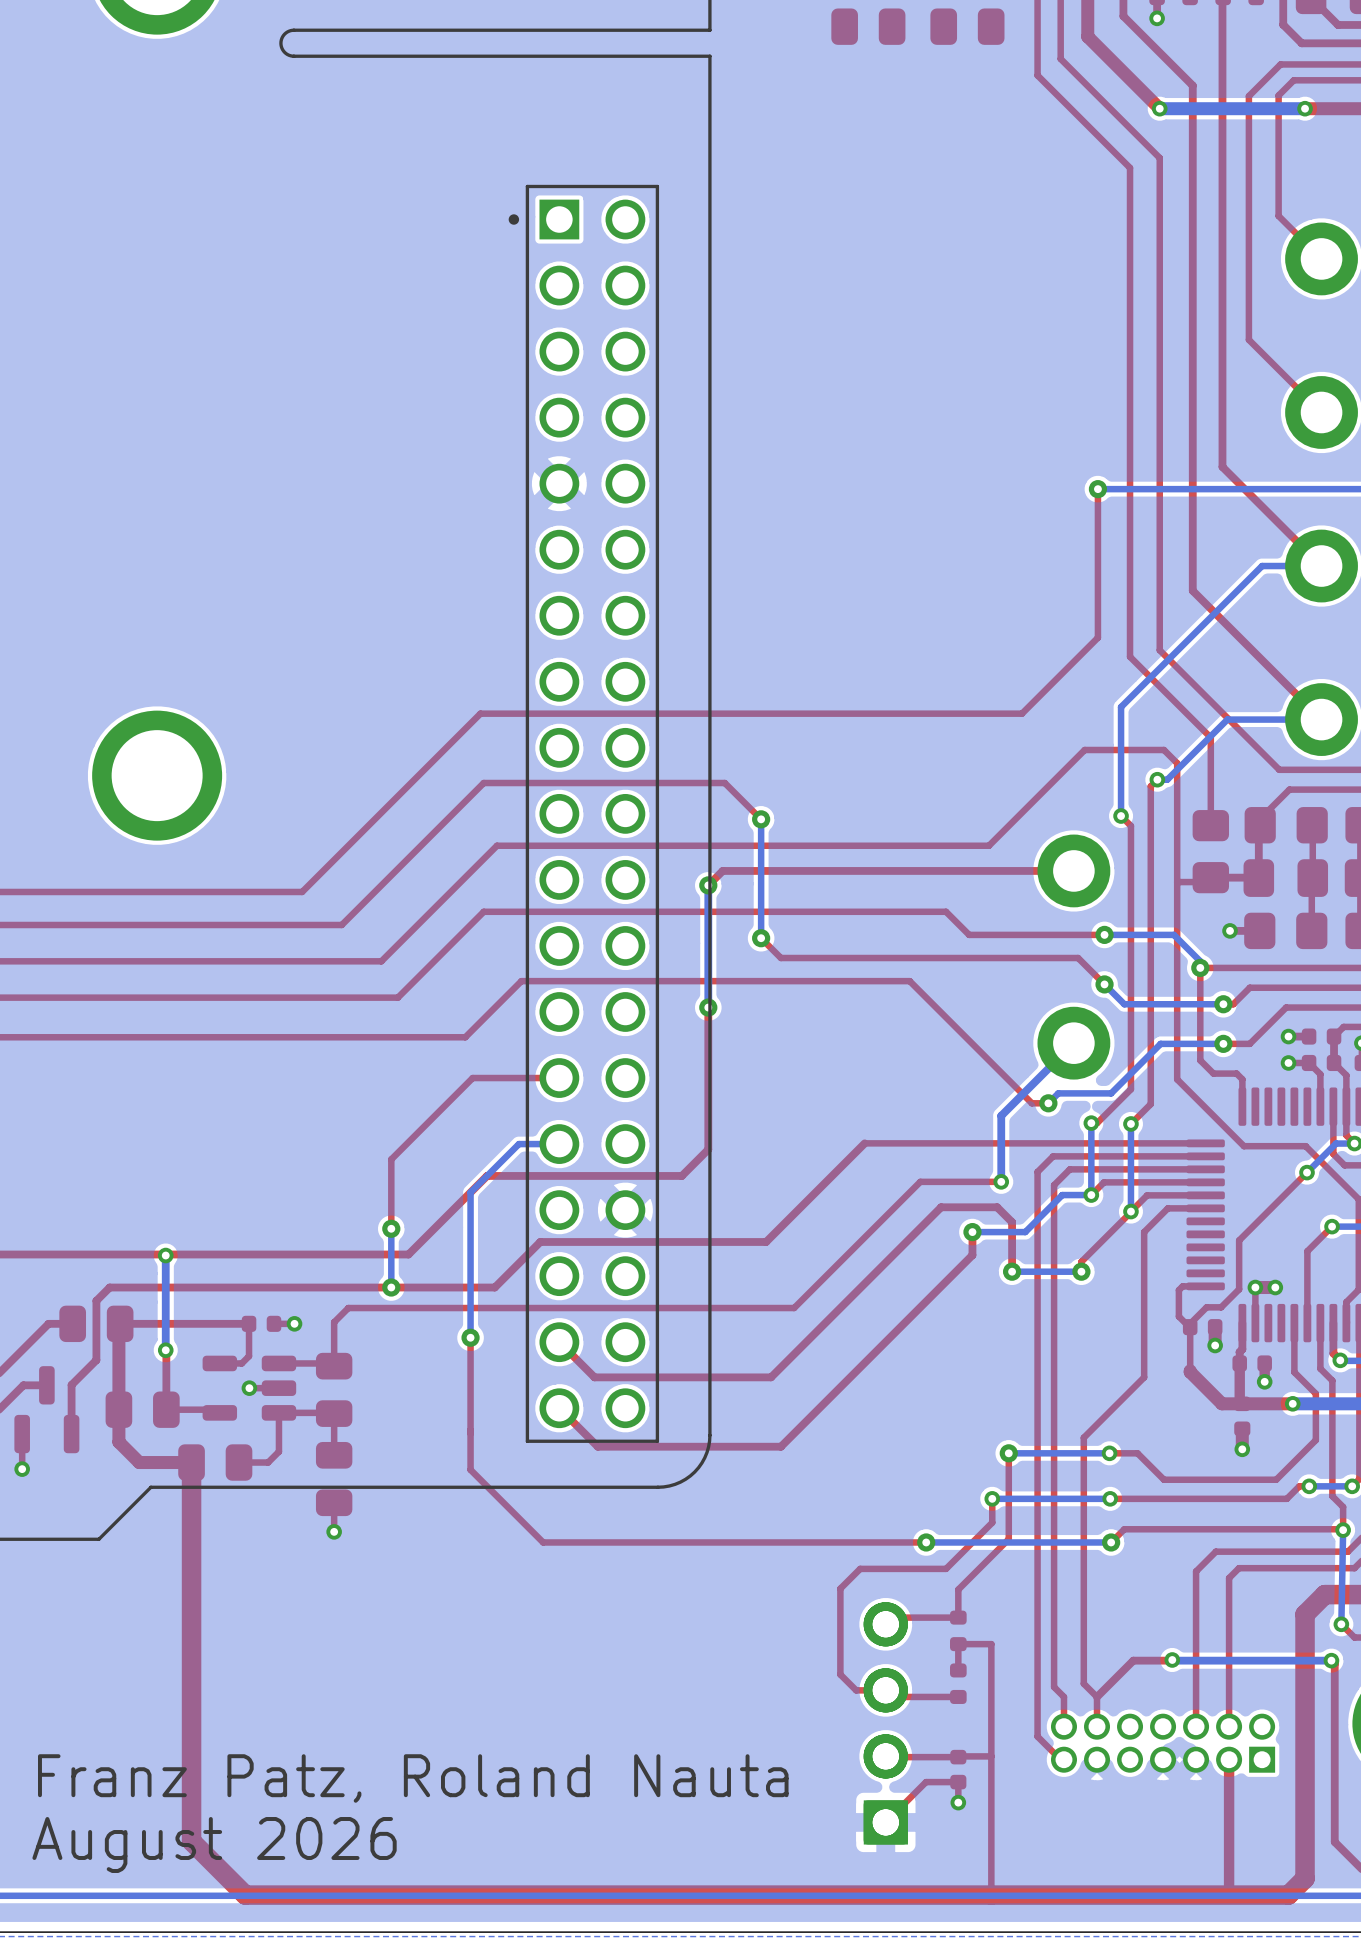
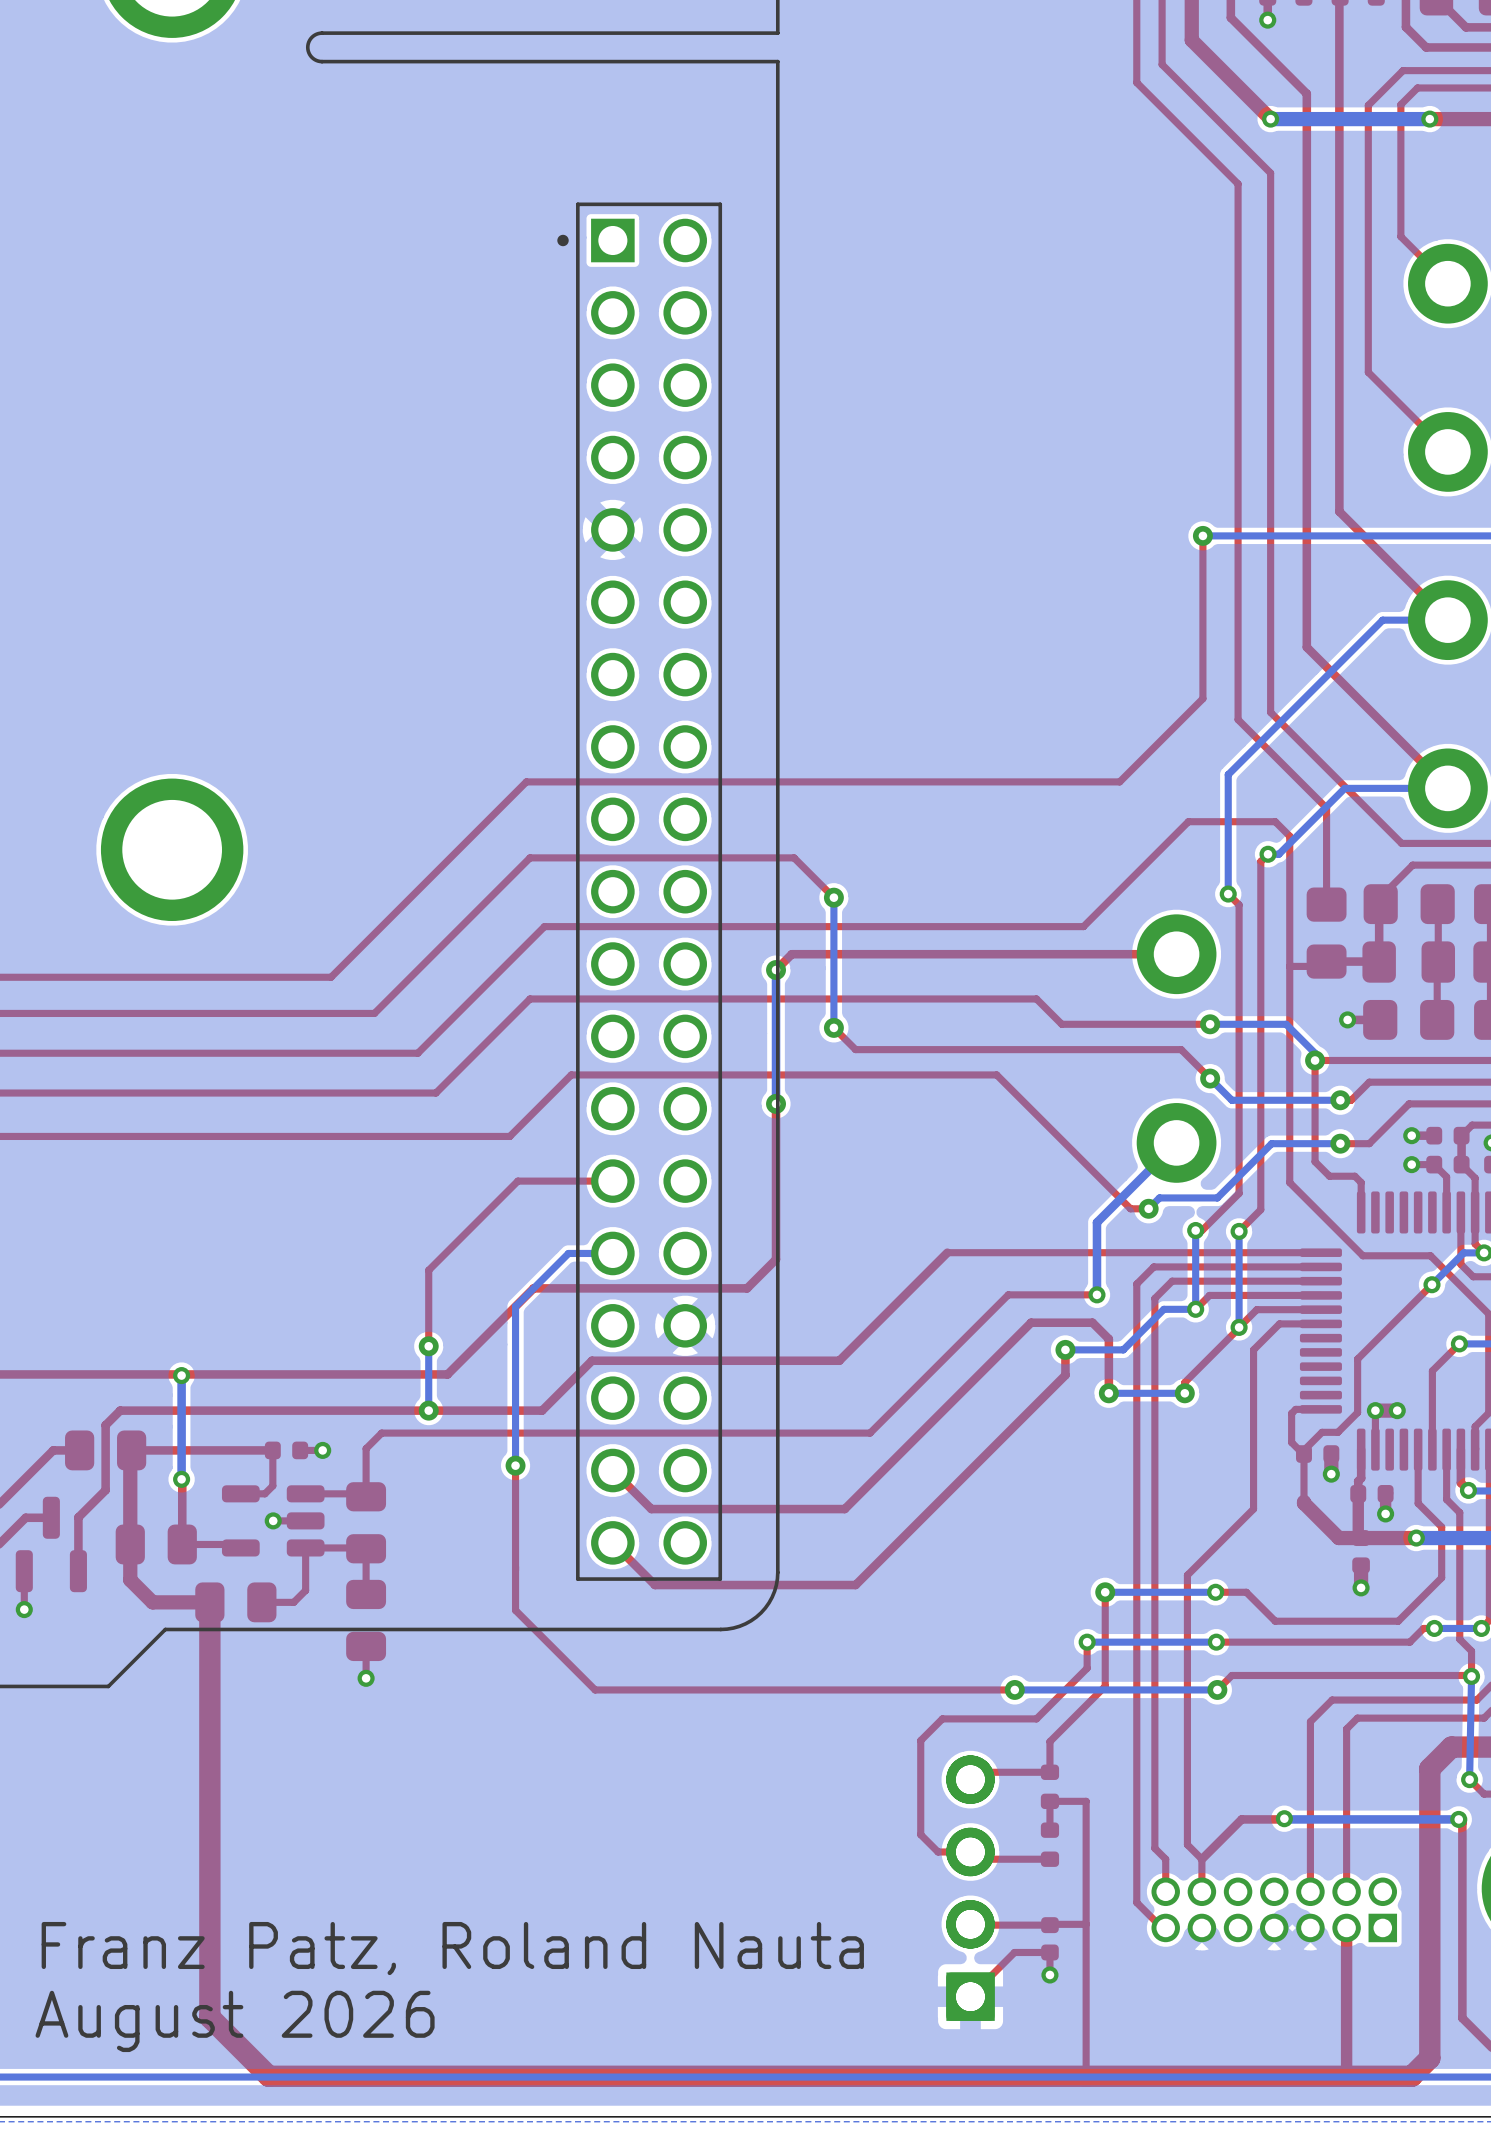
part: (868, 26) -> none
part: (967, 26) -> none

